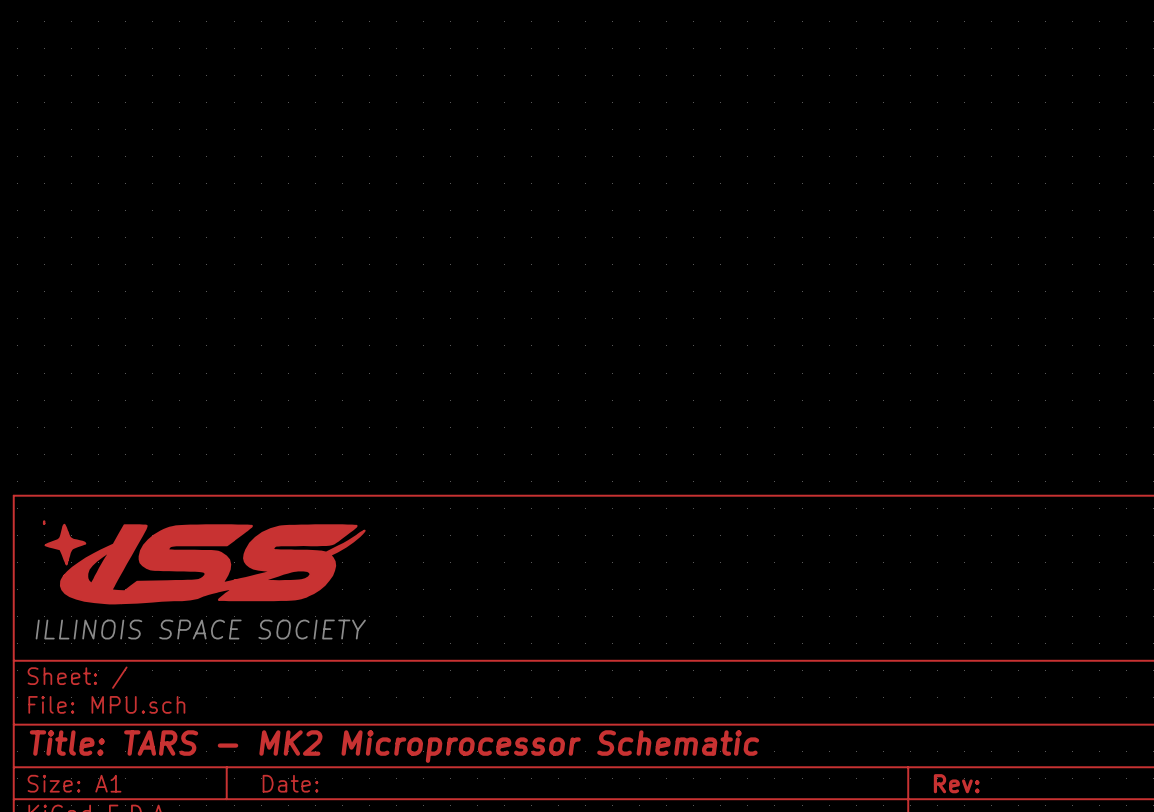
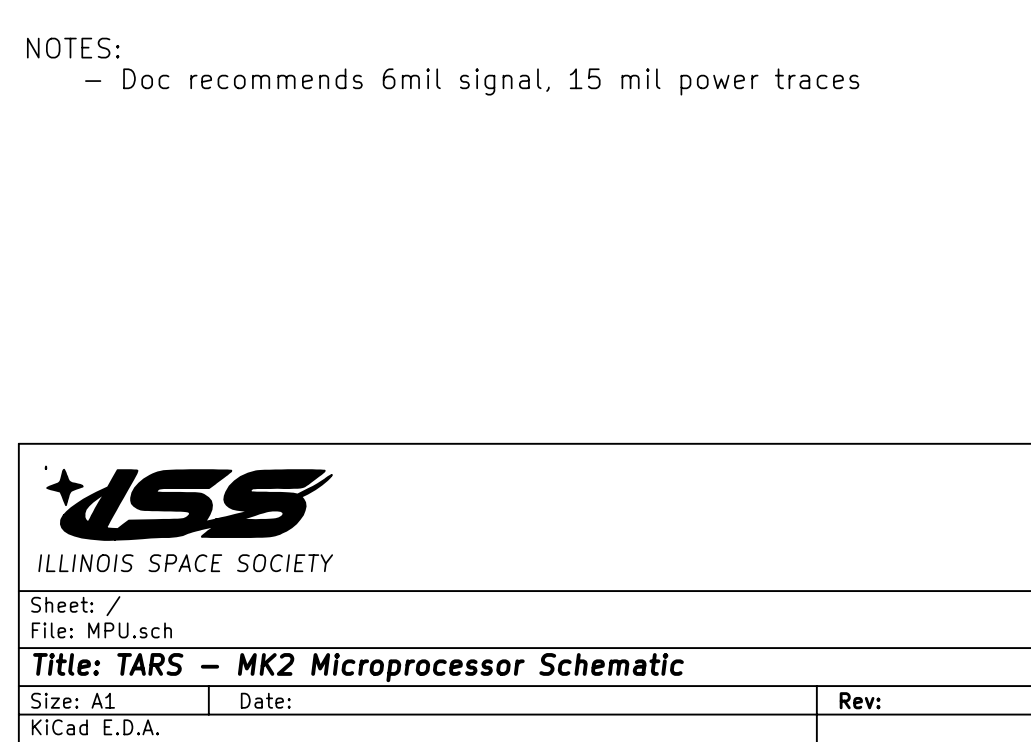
text: none -> NOTES: (73, 48)
text: none -> - Doc recommends 6mil signal, 15 mil power traces (472, 81)

